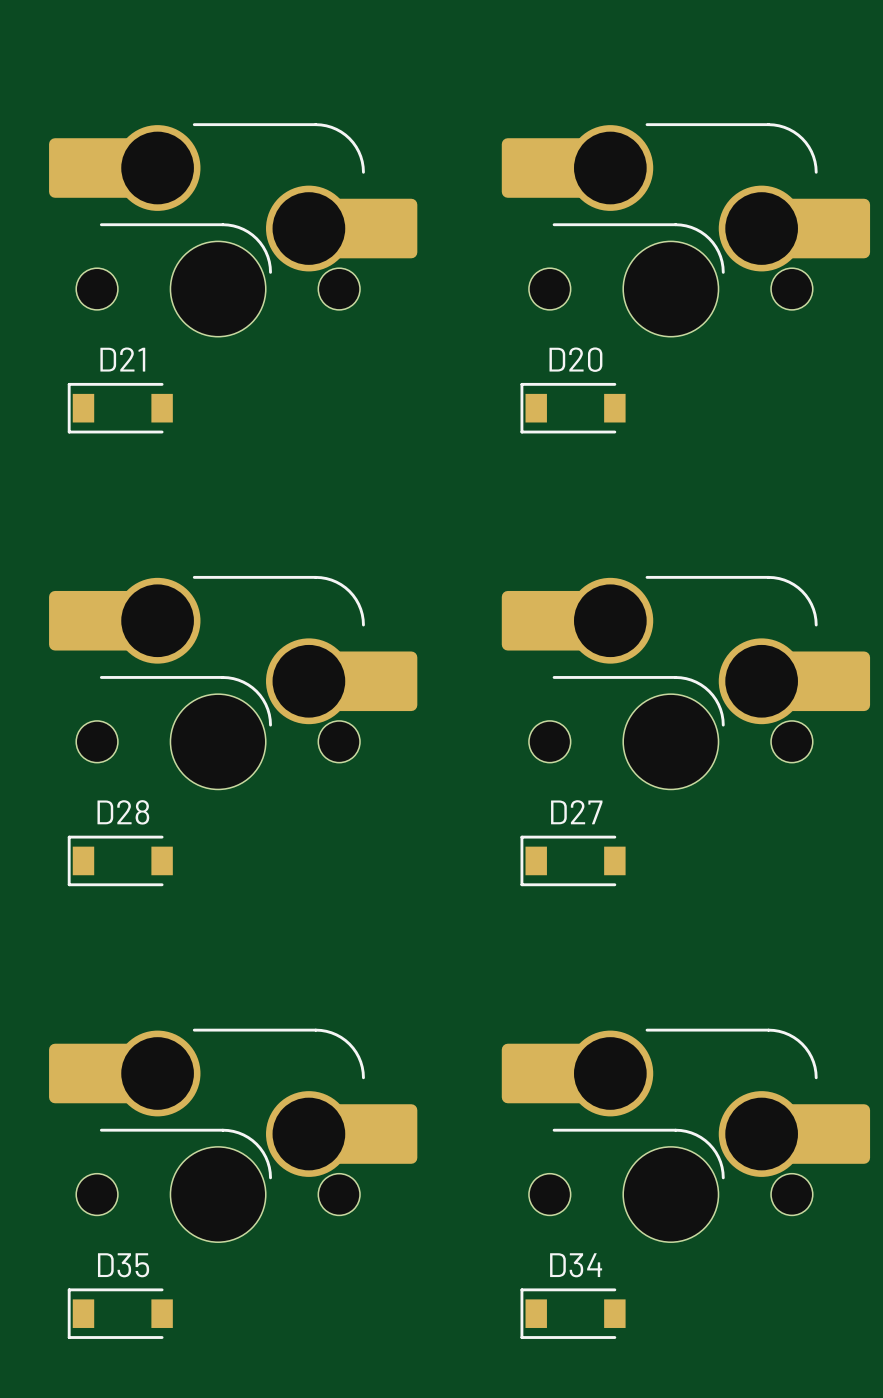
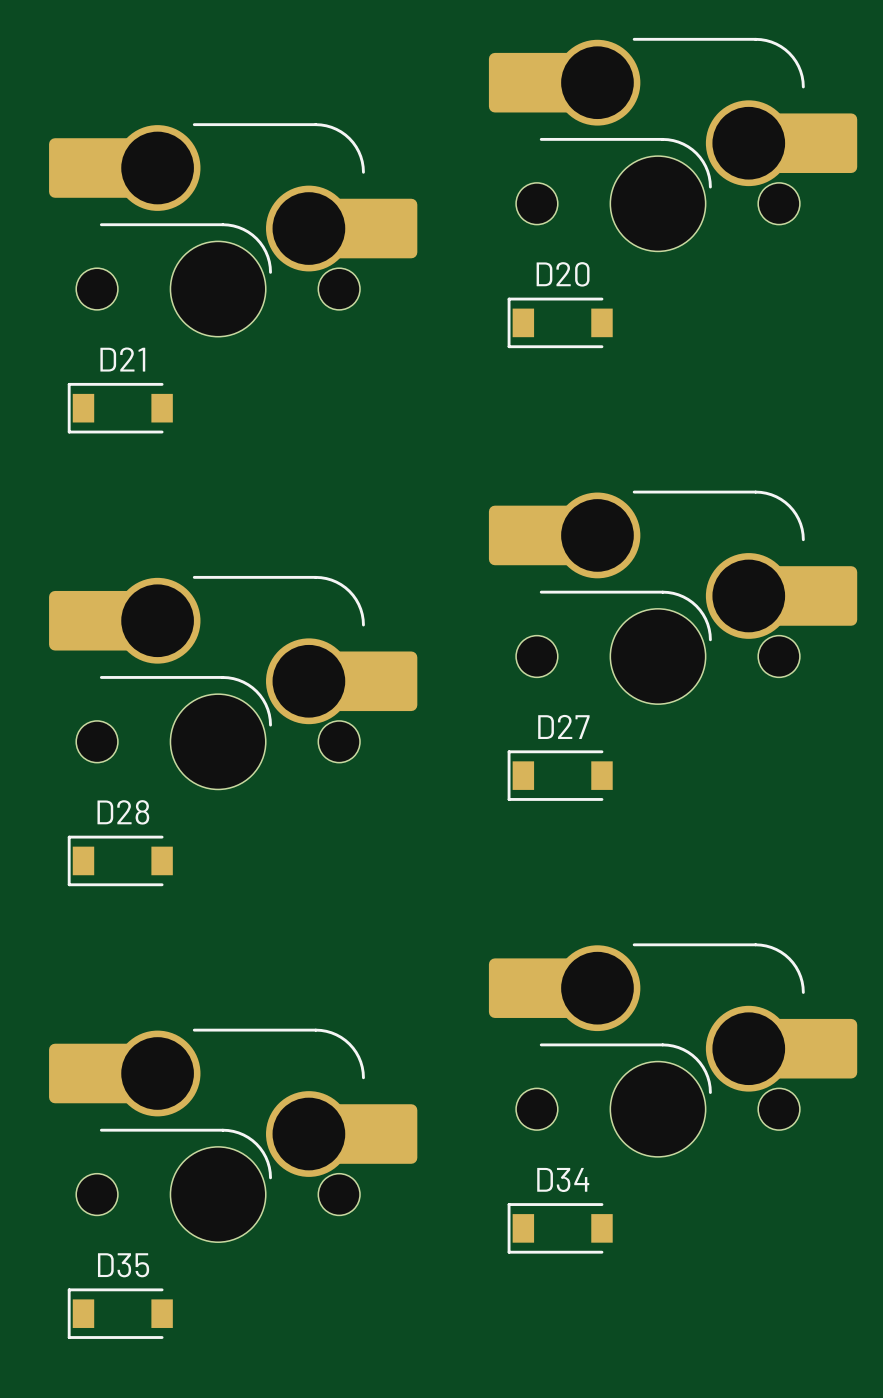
part position: (685, 229) -> (673, 144)
D20 position: (573, 408) -> (560, 322)
part position: (685, 682) -> (673, 597)
D27 position: (573, 860) -> (560, 775)
part position: (685, 1135) -> (673, 1050)
D34 position: (573, 1313) -> (560, 1228)

